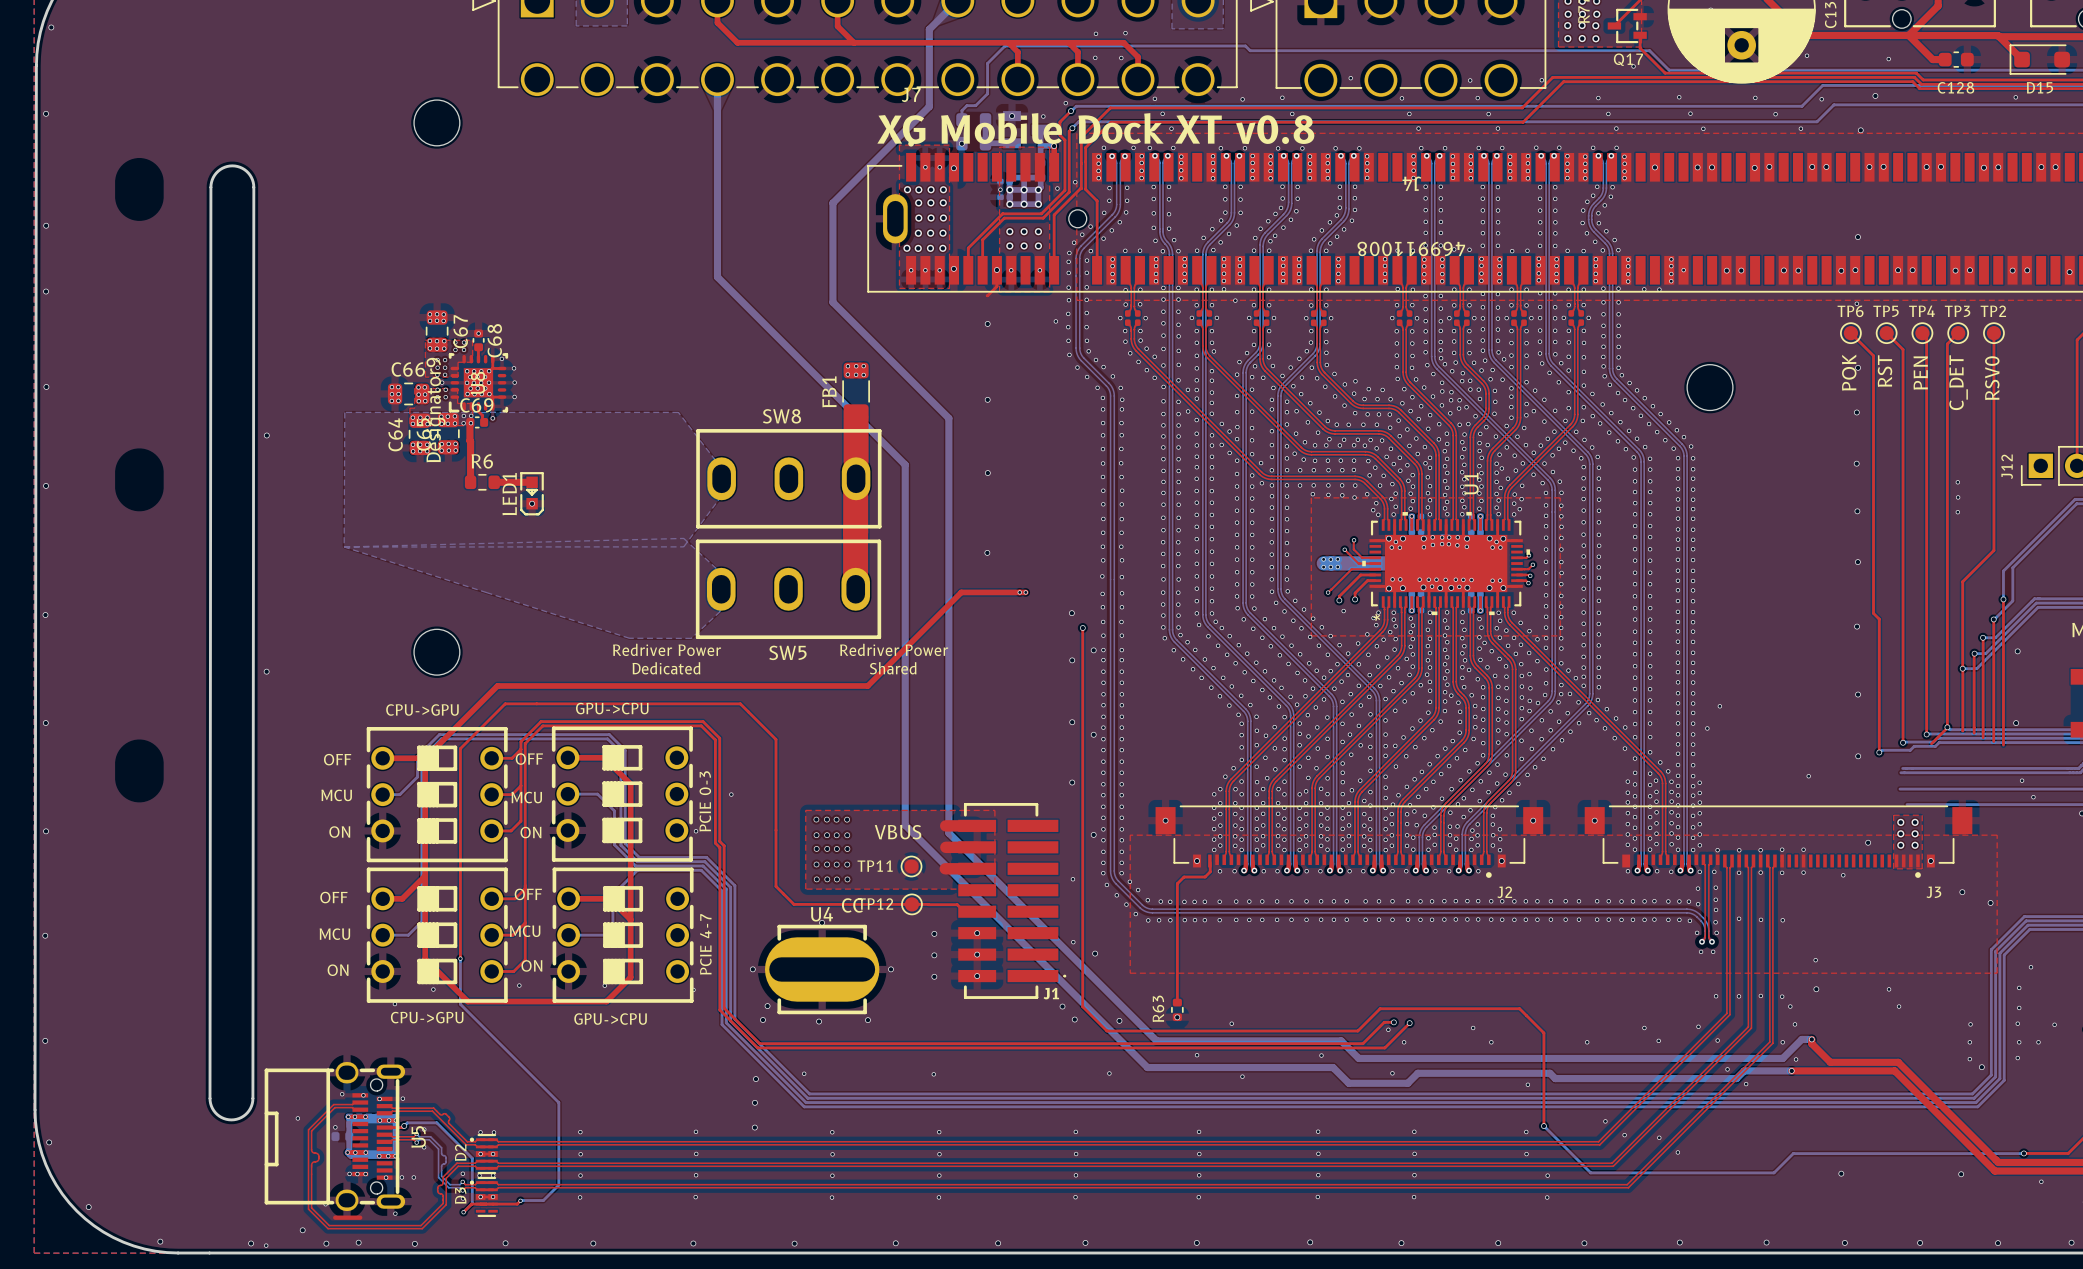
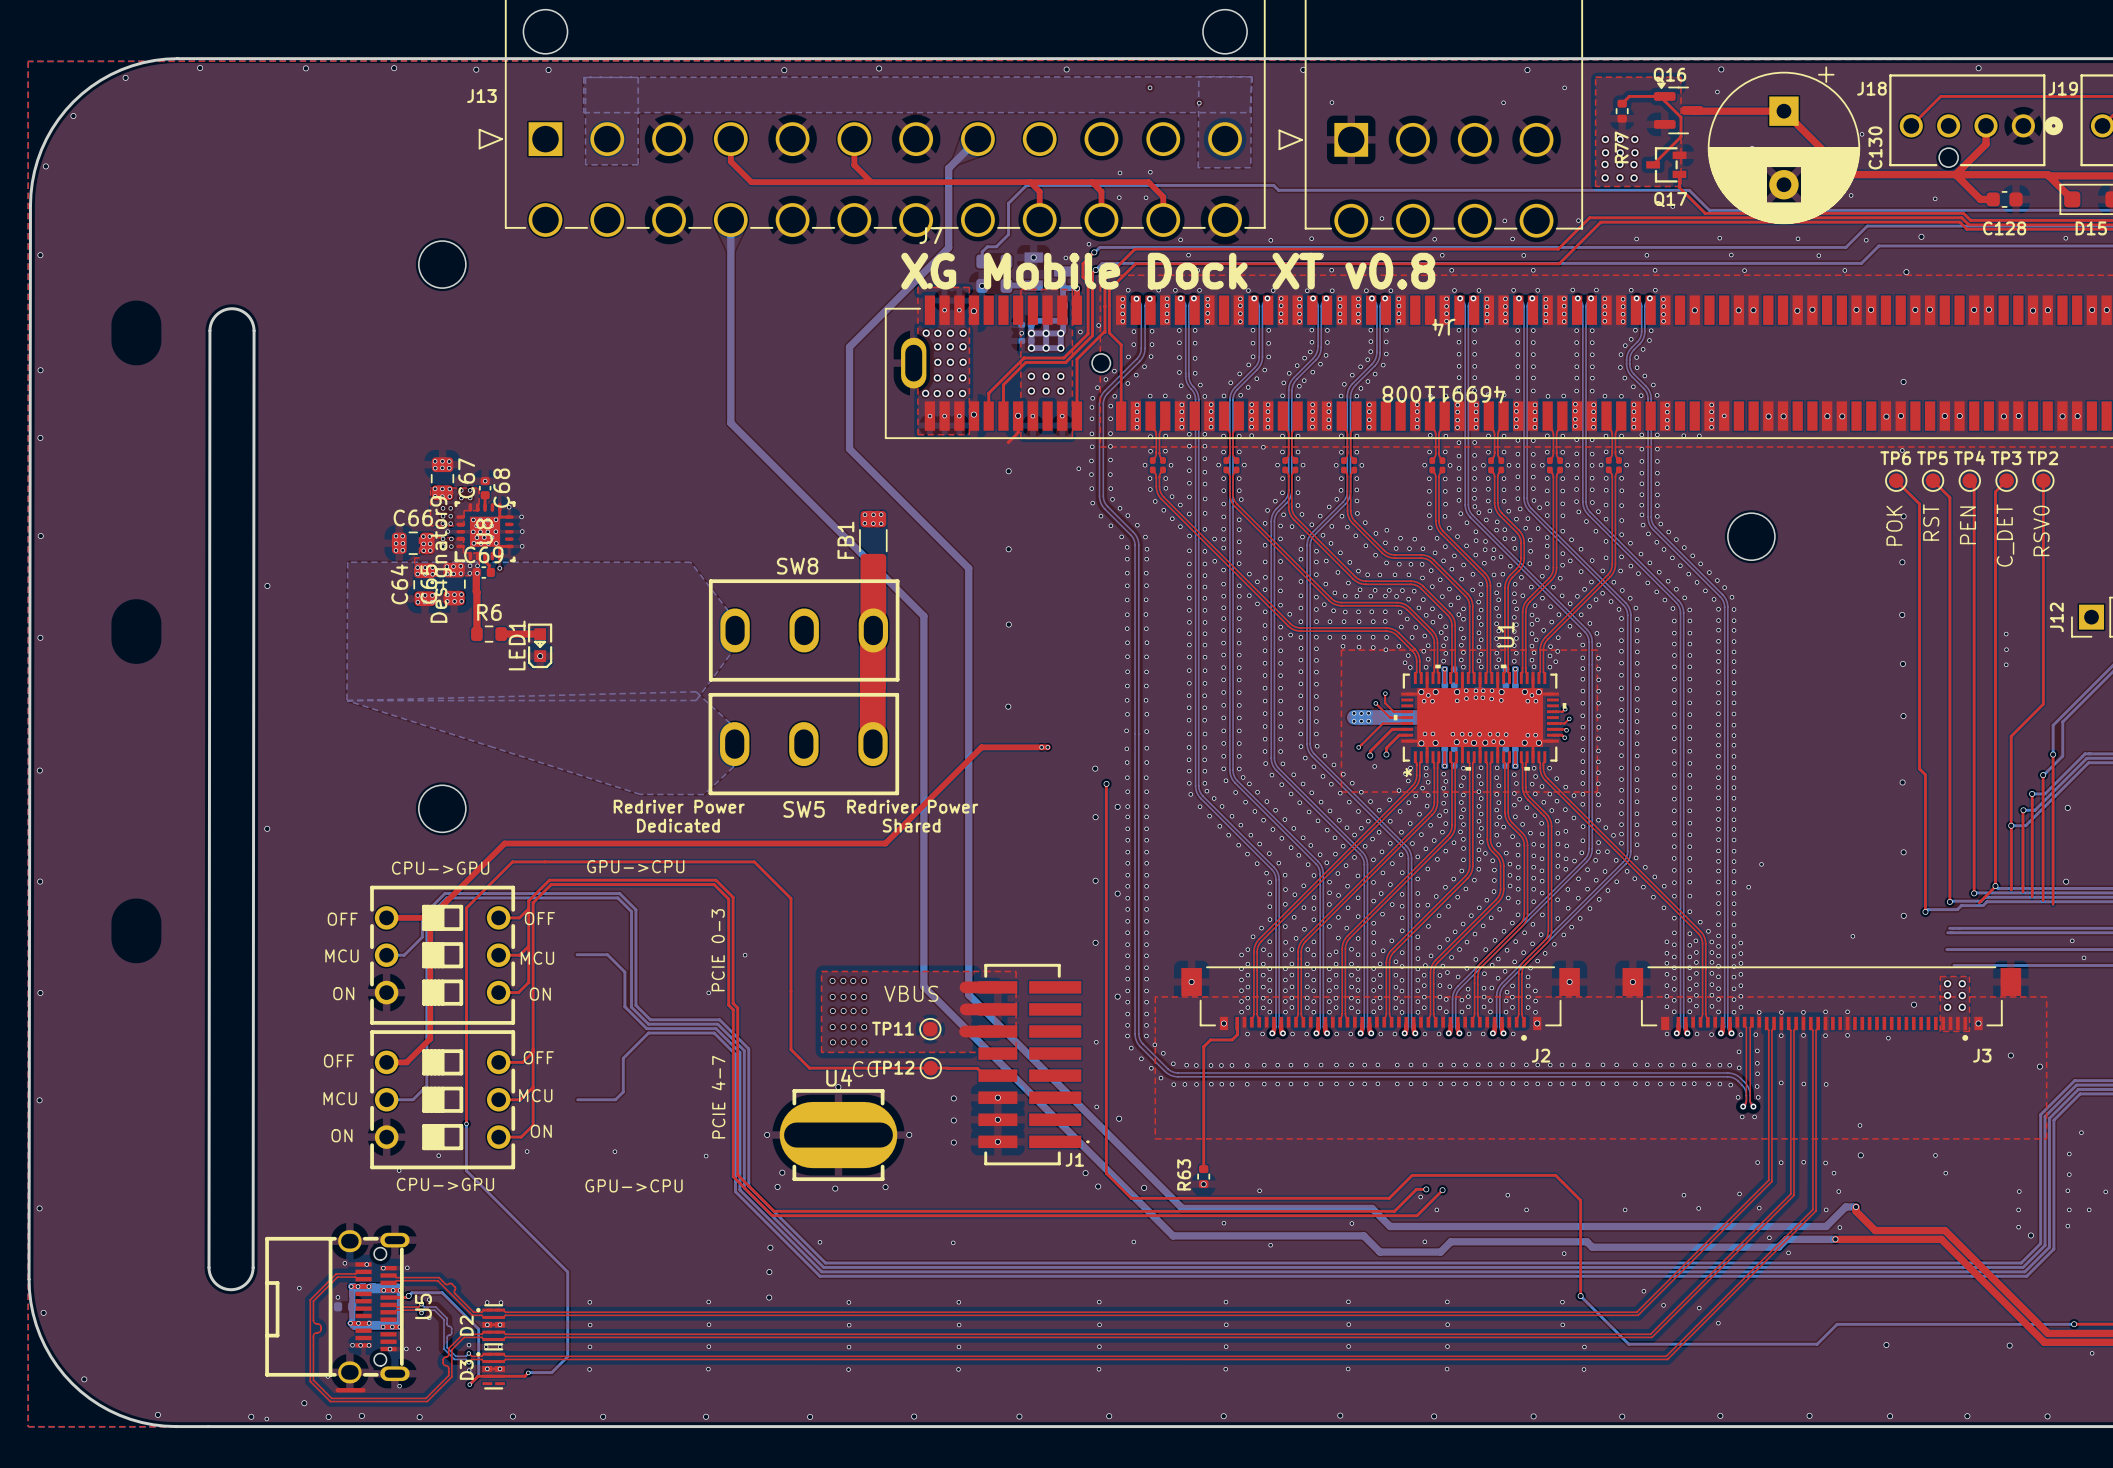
top track: (567, 757) (604, 757) (630, 784) (630, 977) (606, 1001) (467, 1001) (425, 958) (425, 875) -> none
part: (622, 794) -> none
top track: (568, 898) (609, 898) (630, 919) -> none
part: (623, 935) -> none

